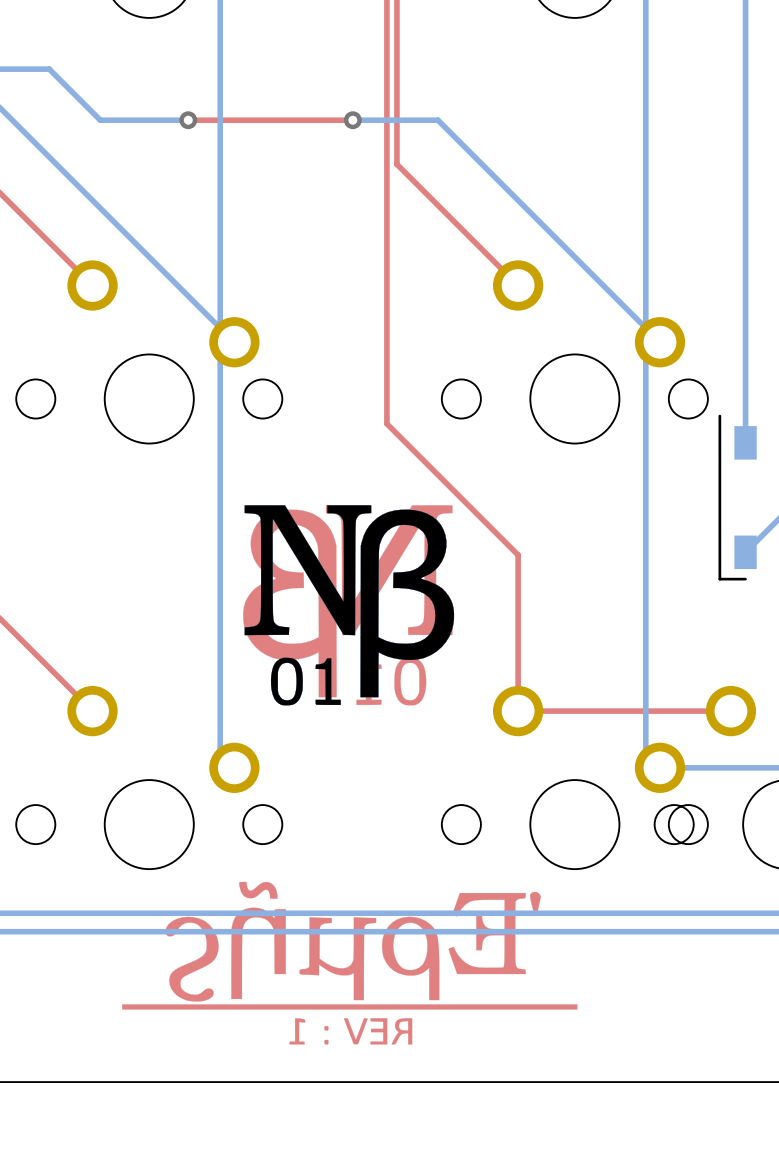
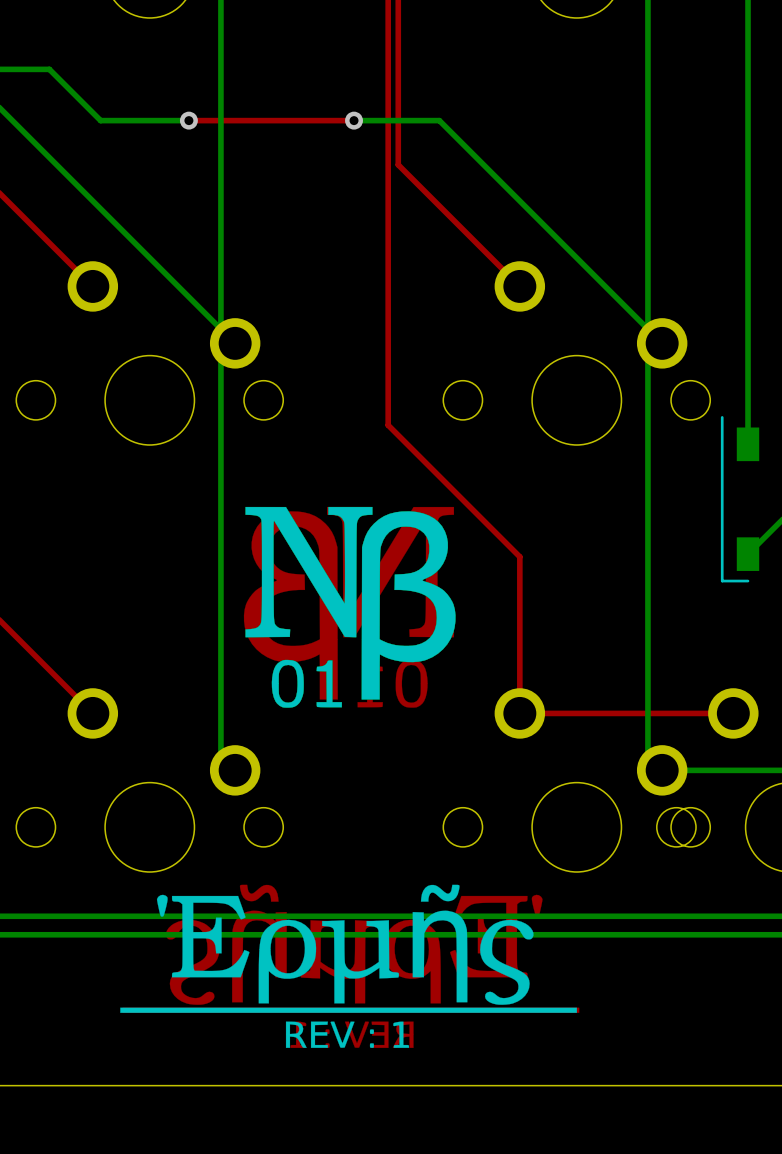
drawing: none -> [120, 884, 577, 1048]

